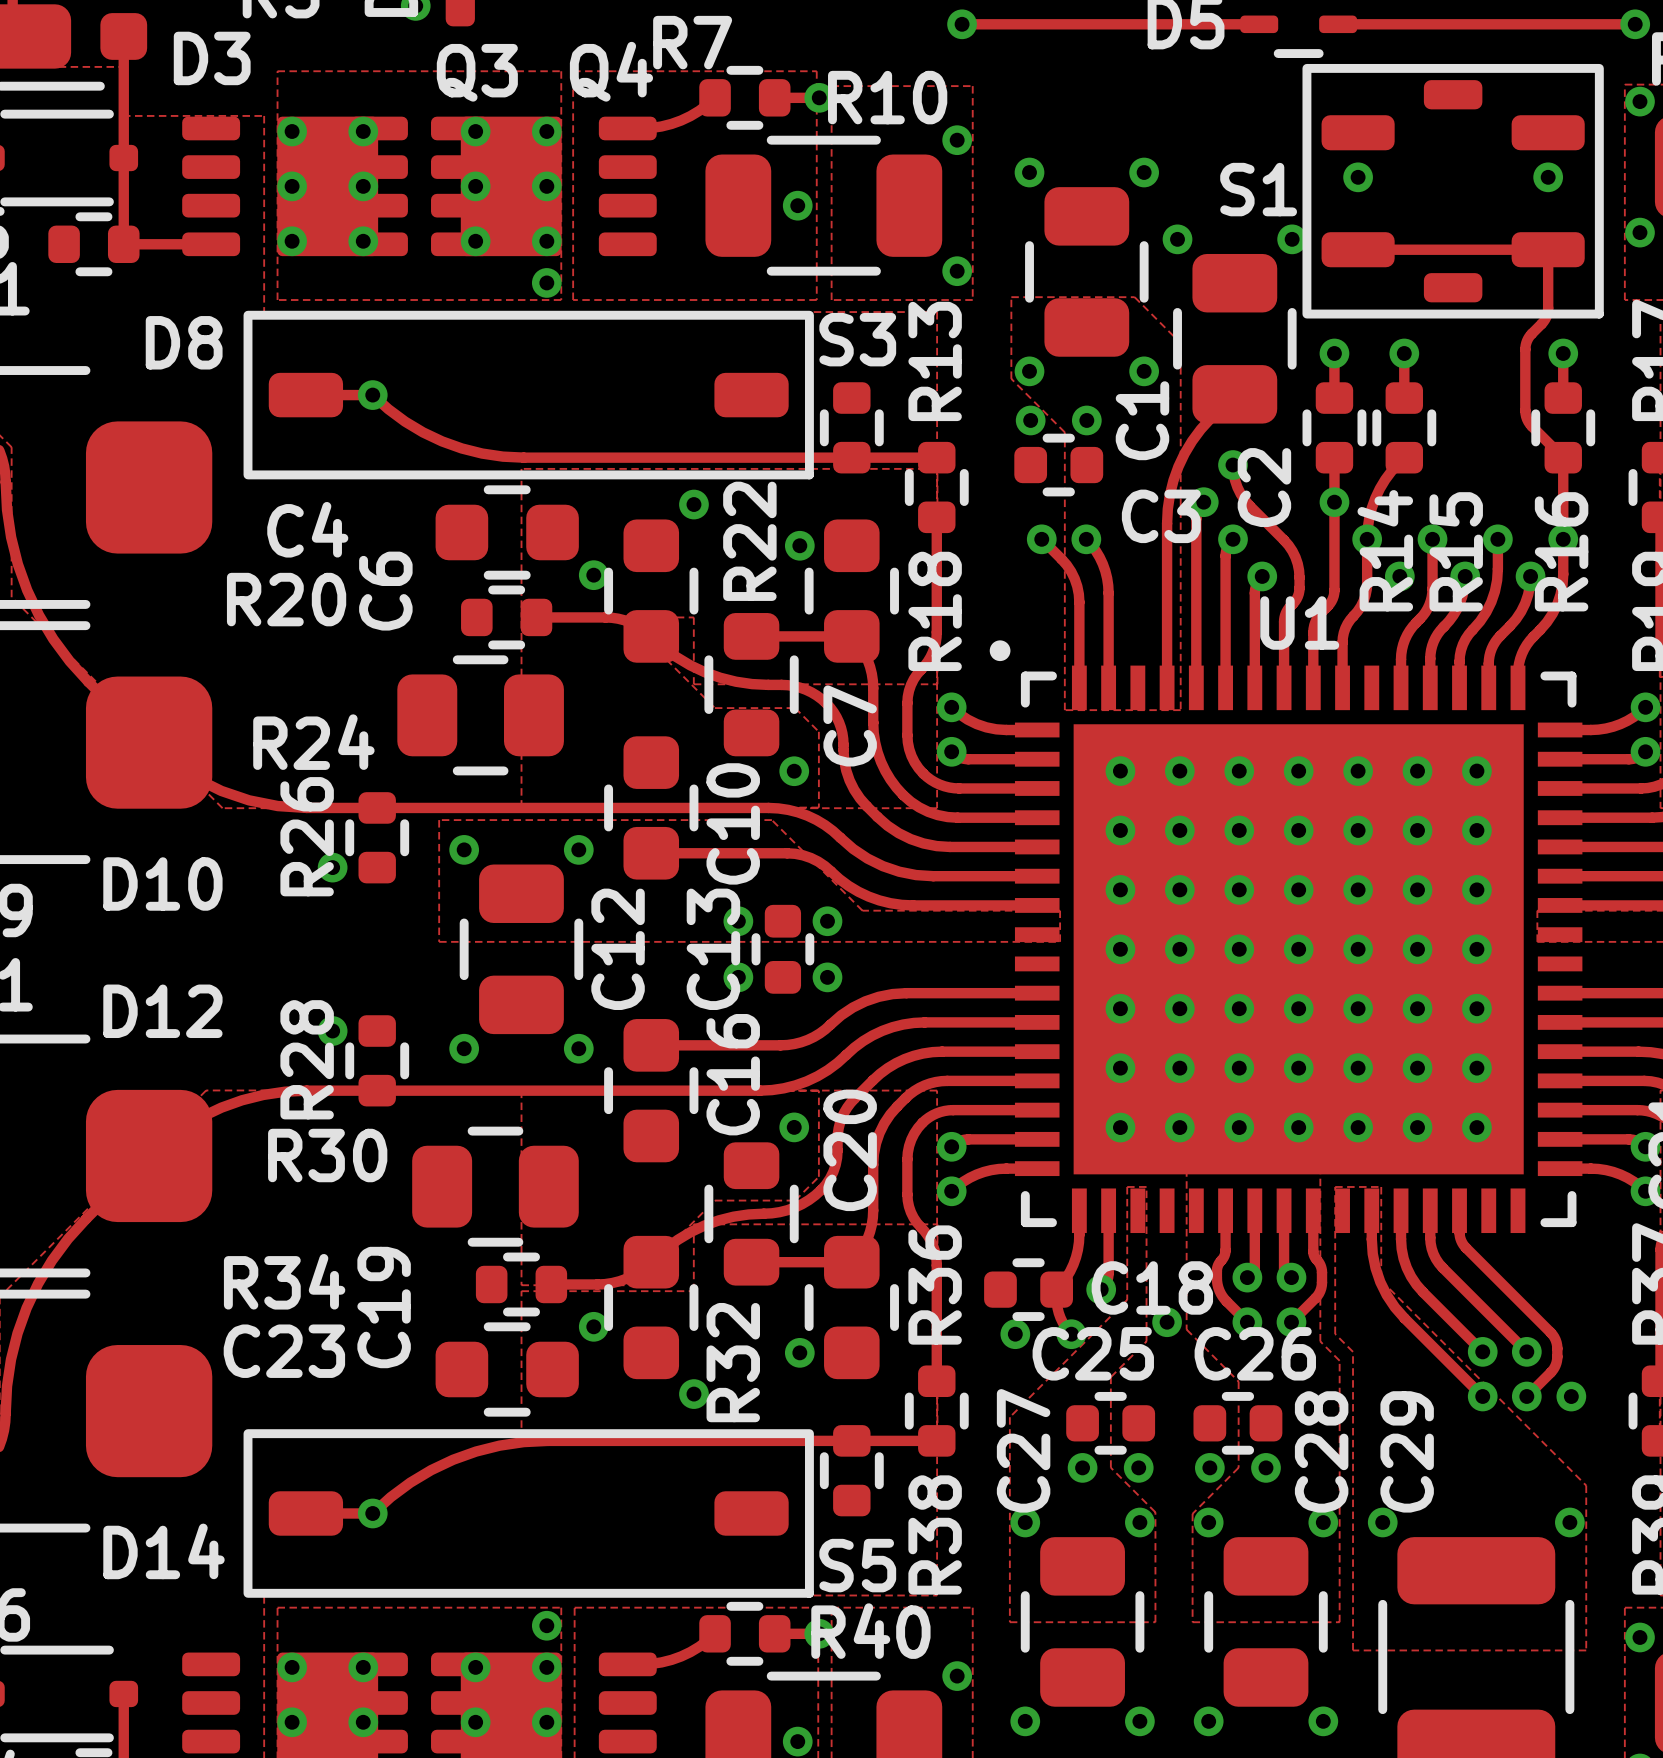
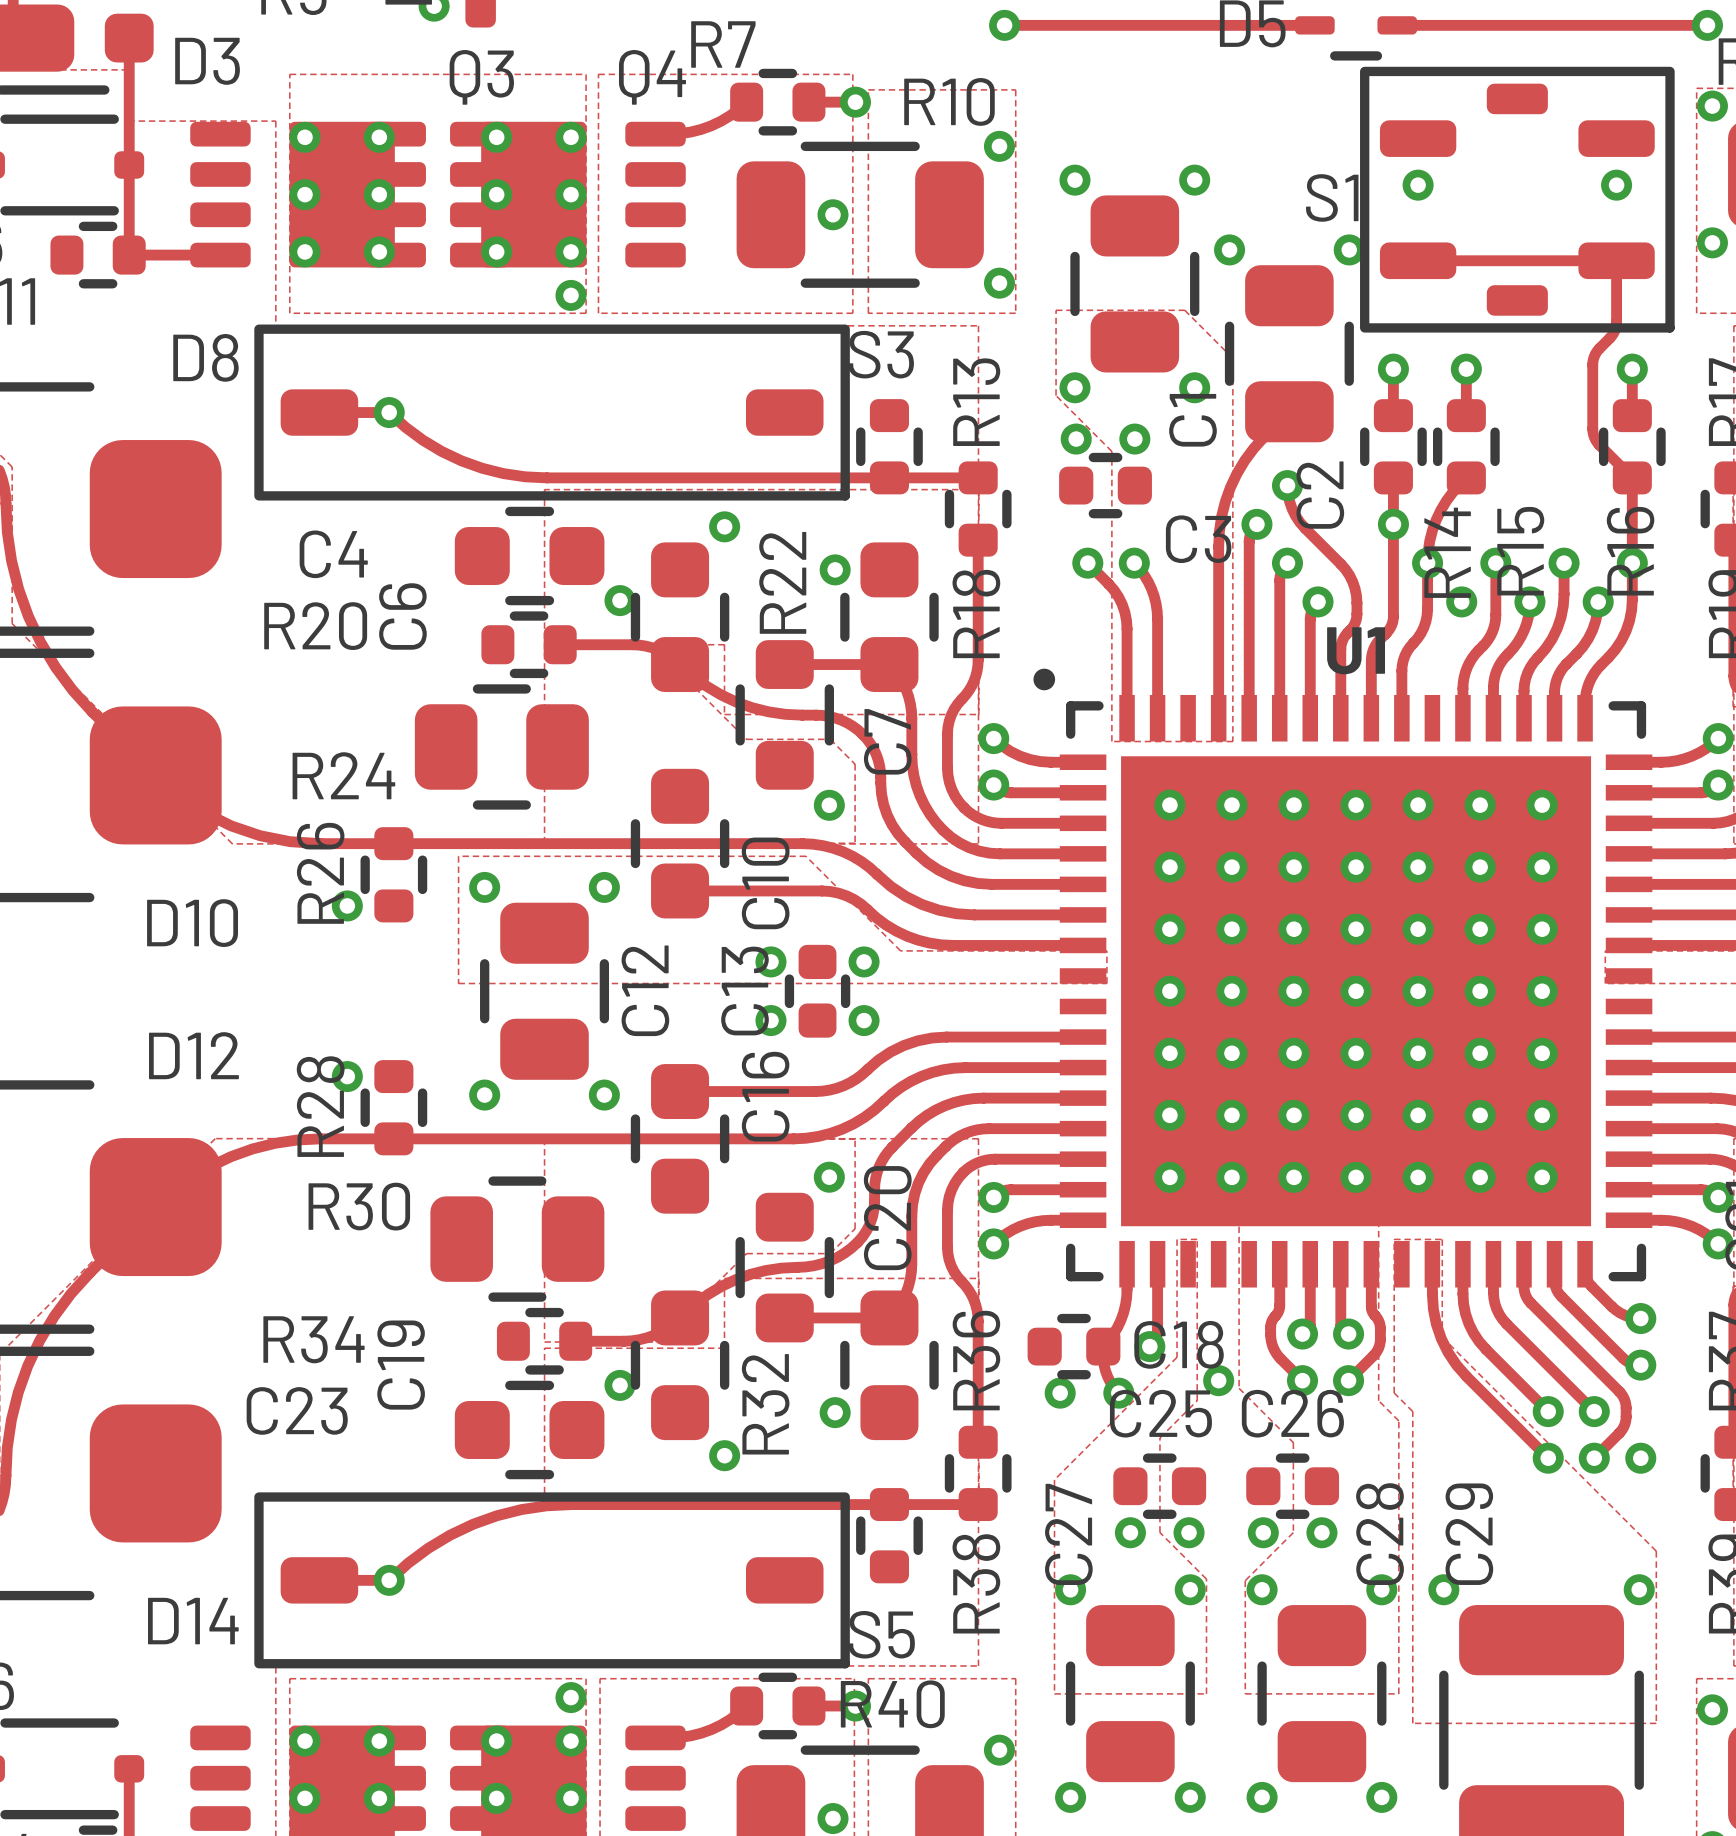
track: none -> (1554, 1264) (1554, 1284) (1559, 1294) (1623, 1358) (1630, 1363) (1639, 1365)
track: none -> (1585, 1264) (1585, 1274) (1588, 1283) (1611, 1306) (1625, 1315) (1640, 1318)
via: none -> (1640, 1318)
via: none -> (1640, 1365)

